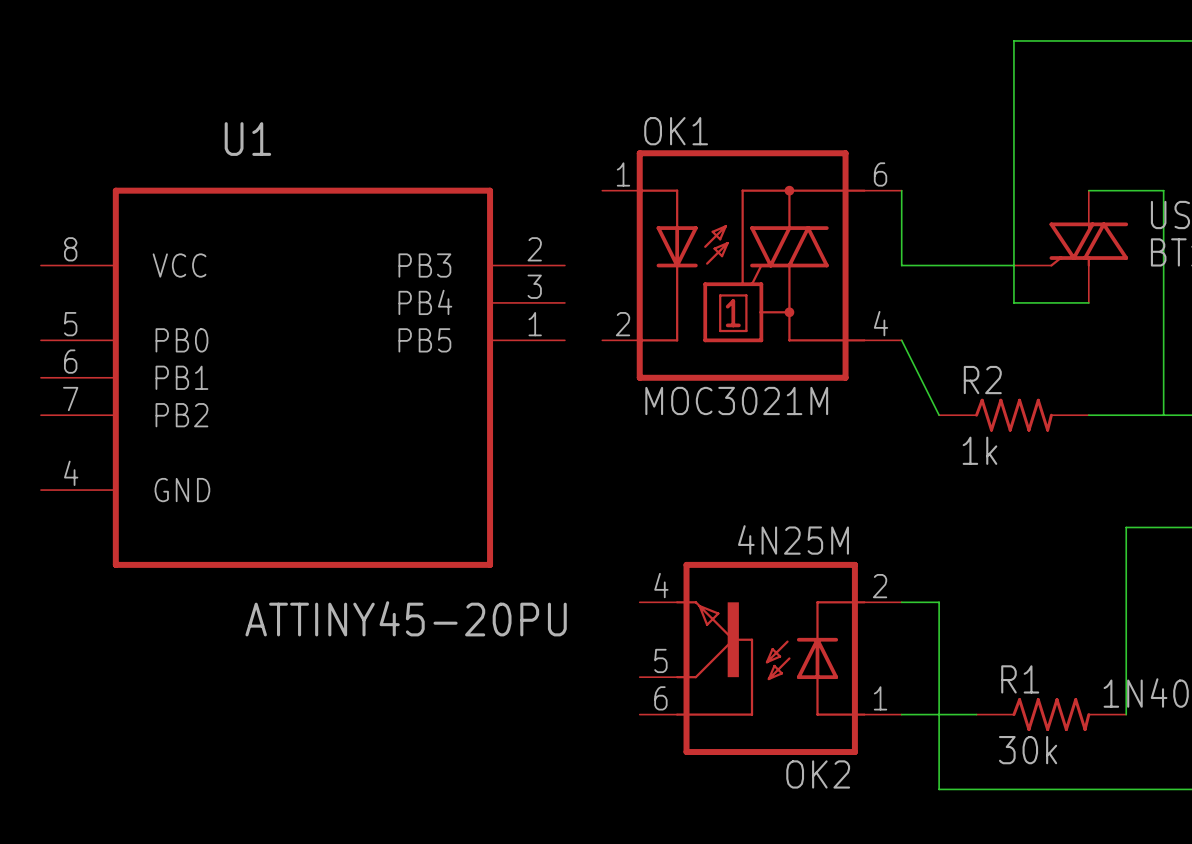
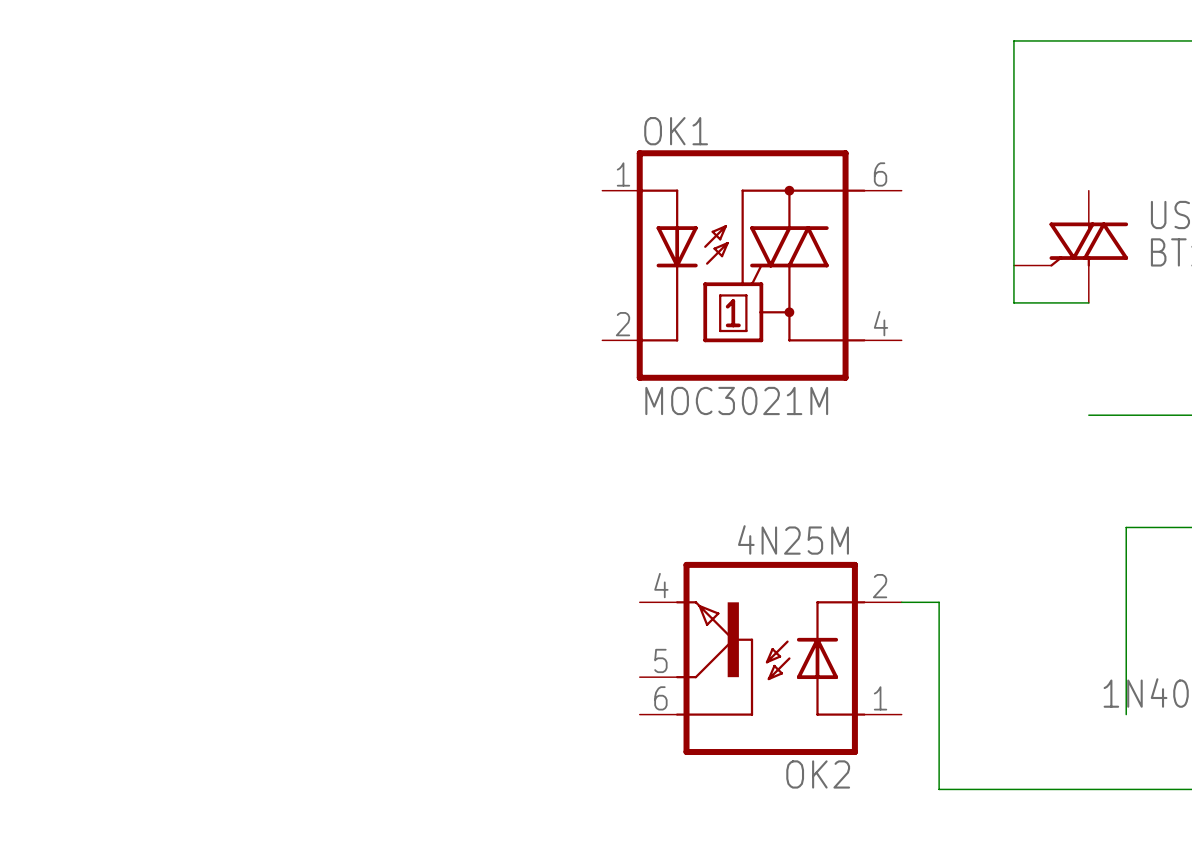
wire: (901, 190) (901, 265) (1013, 265) -> none
wire: (1088, 190) (1163, 190) (1163, 415) -> none
wire: (901, 340) (939, 415) -> none
U1: ATTINY45-20PU (302, 377) -> none
R2: 1k (1013, 415) -> none
wire: (901, 714) (976, 714) -> none
R1: 30k (1051, 714) -> none

